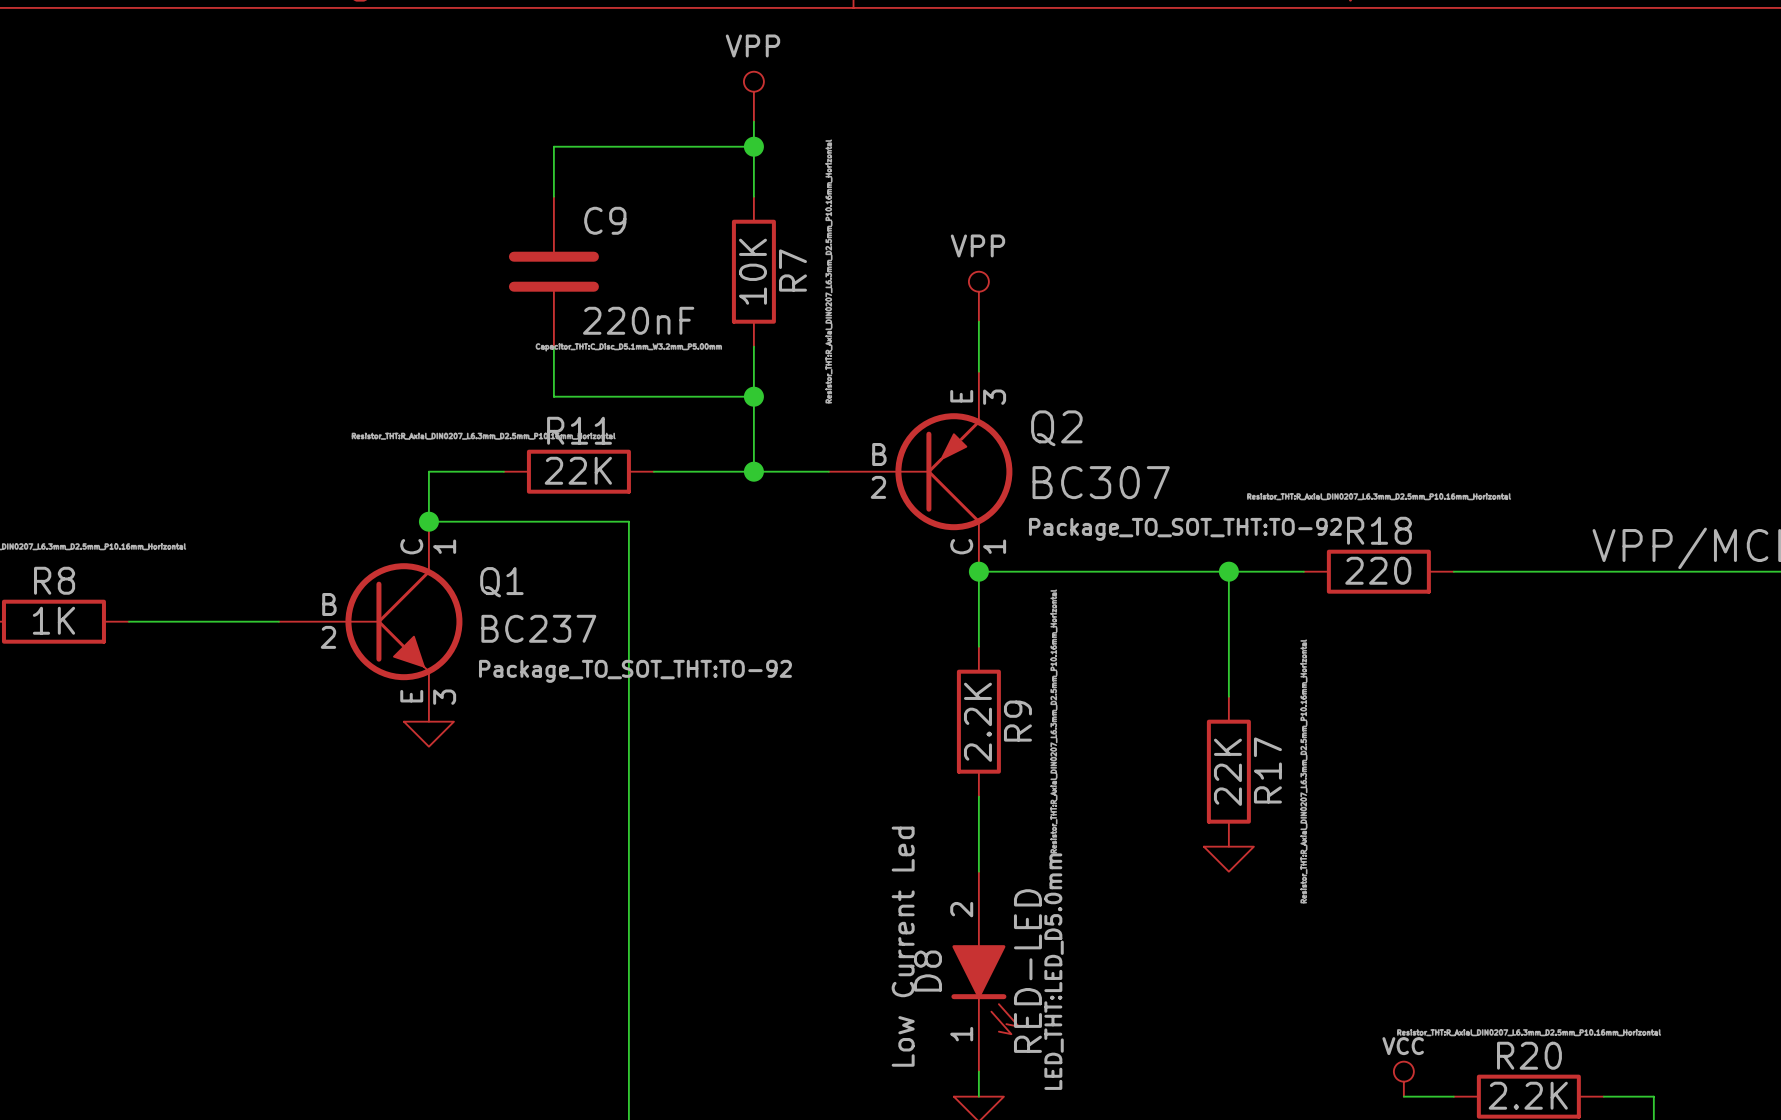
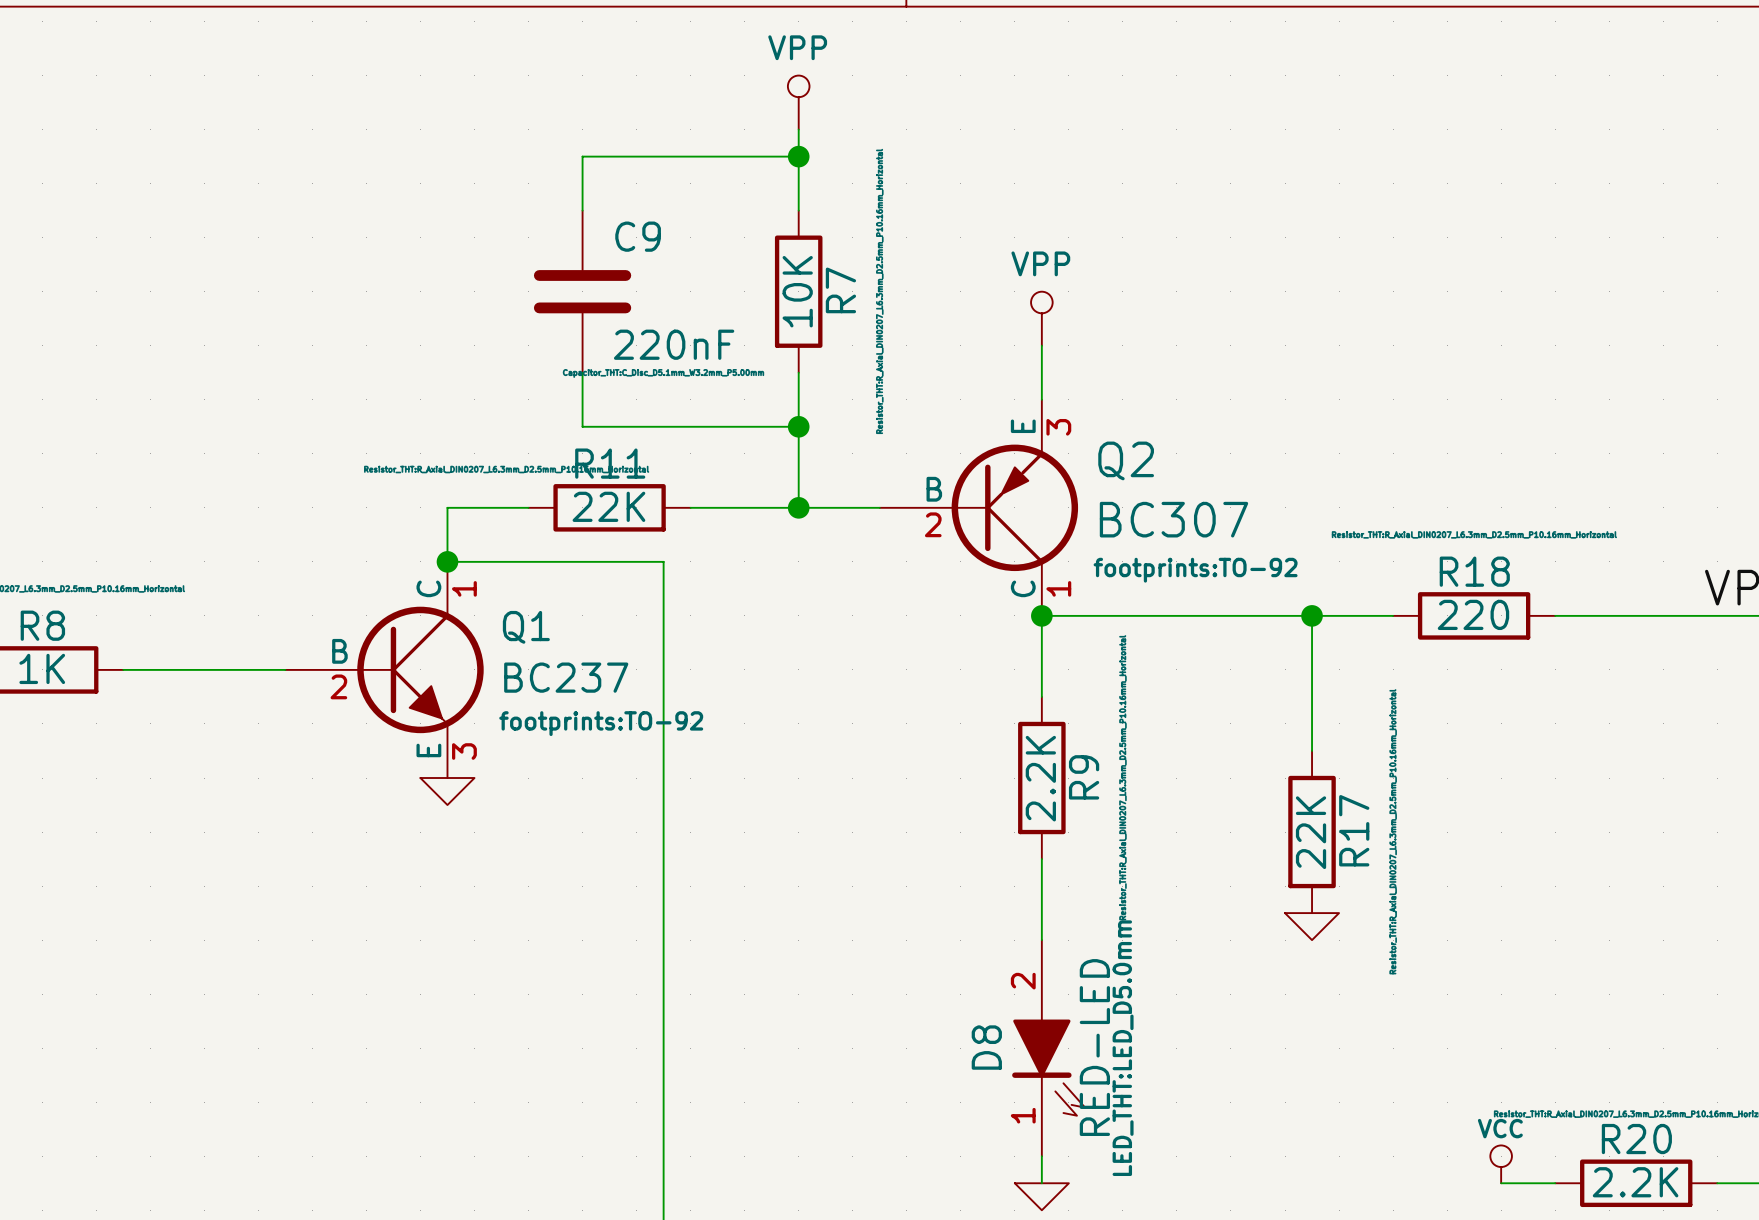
Q2 text: Package_TO_SOT_THT:TO-92 (1185, 529) -> footprints:TO-92 (1195, 570)
Q1 text: Package_TO_SOT_THT:TO-92 (635, 671) -> footprints:TO-92 (601, 723)
D8 text: Low Current Led (903, 946) -> none

